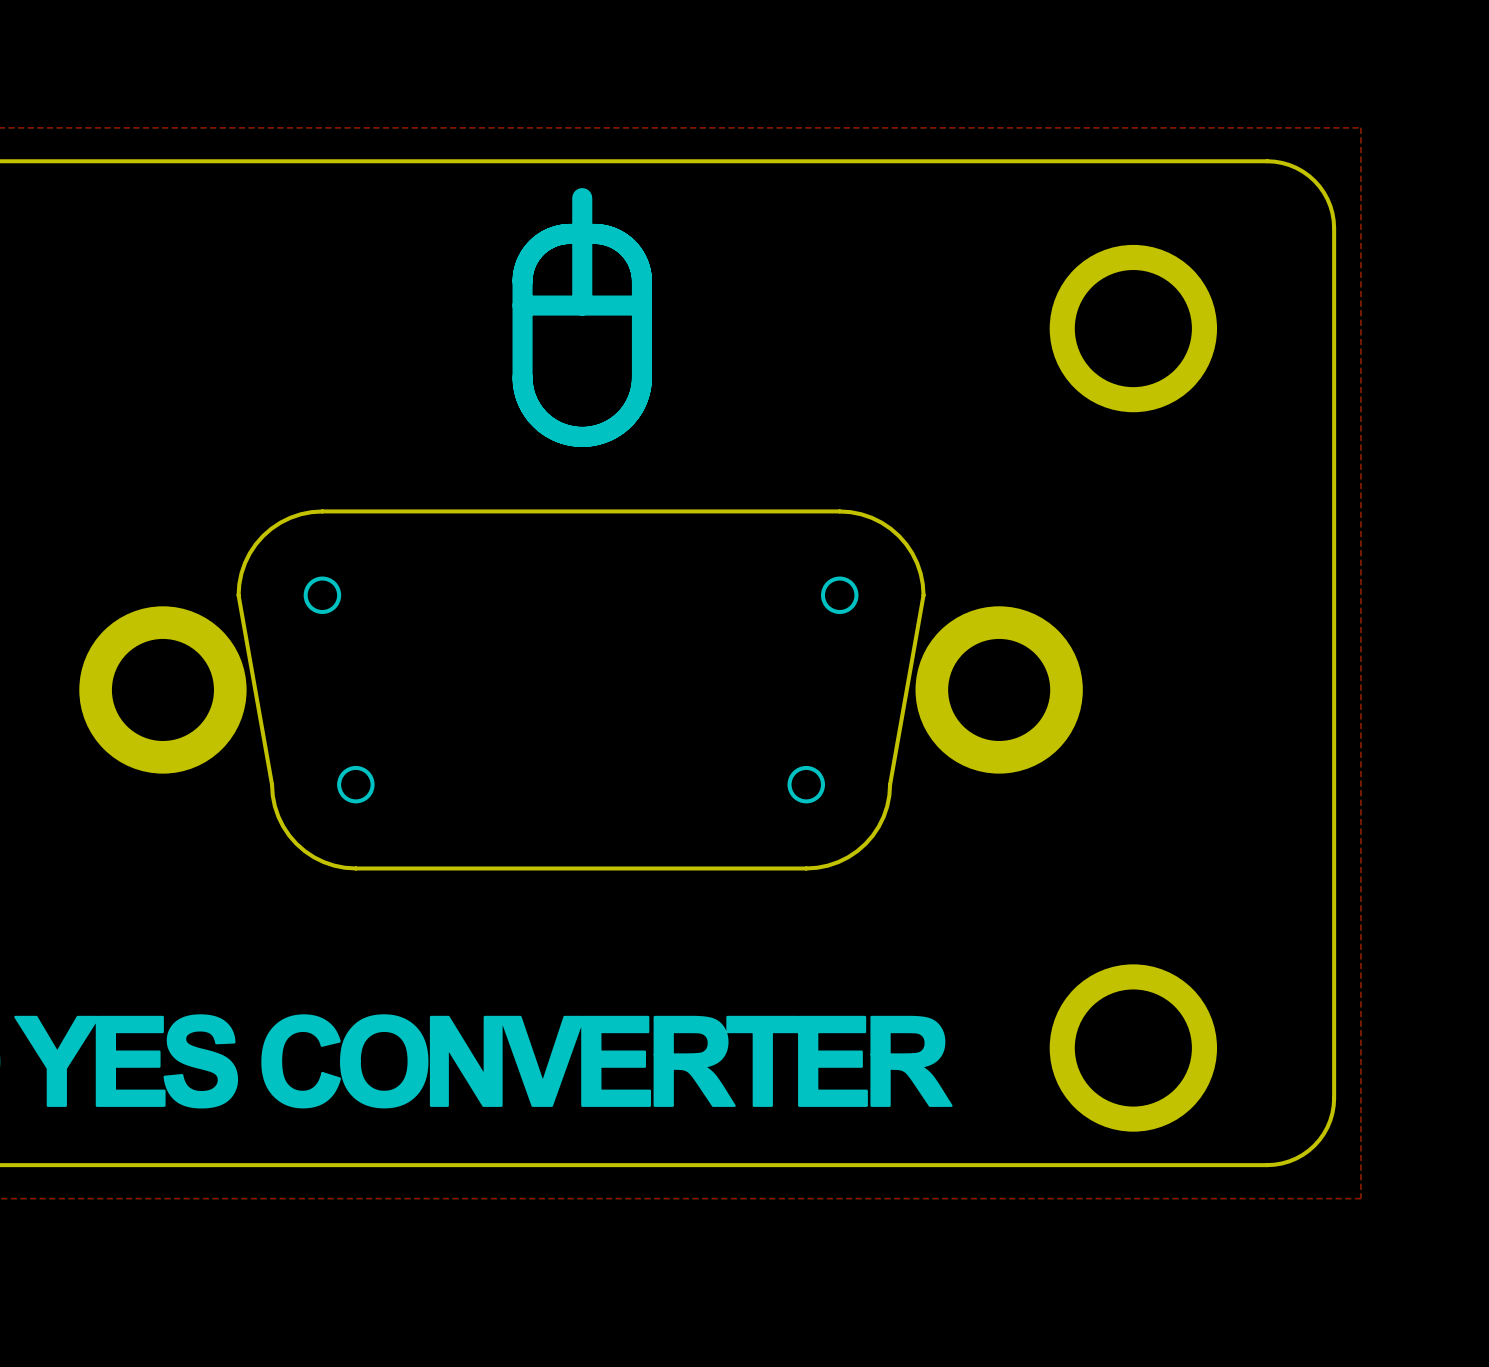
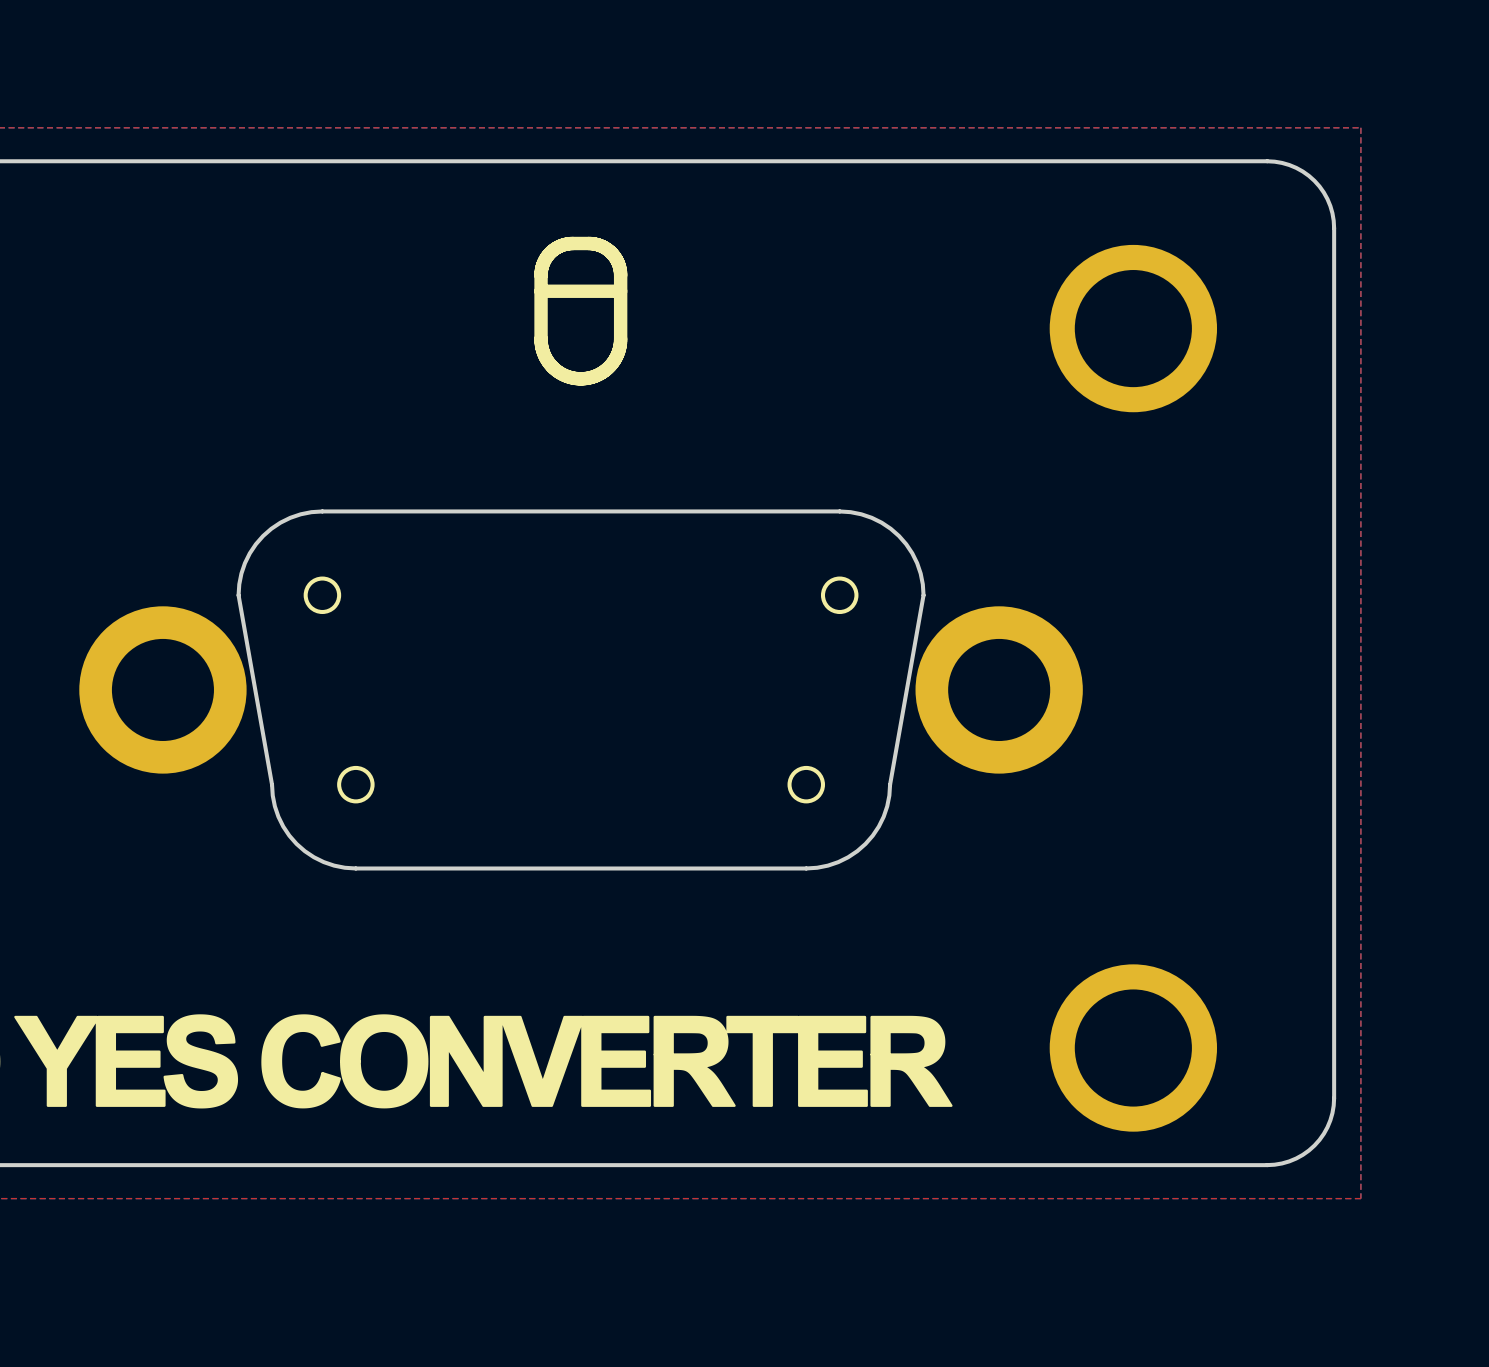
line: (582, 198) (582, 305) -> none
line: (567, 233) (553, 236) (541, 243) (530, 254) (524, 267) (522, 281) (522, 383) (529, 405) (544, 423) (564, 434) (588, 436) (605, 432) (620, 423) (631, 410) (639, 394) (641, 377) (641, 276) (635, 256) (618, 240) (601, 234) (567, 233) -> none
line: none -> (569, 243) (592, 243) (604, 247) (615, 257) (620, 272) (620, 339) (618, 350) (613, 361) (606, 369) (596, 375) (584, 378) (568, 377) (555, 369) (545, 358) (541, 343) (542, 265) (552, 250) (569, 243)
line: none -> (541, 291) (620, 291)
line: (522, 305) (641, 305) -> none

